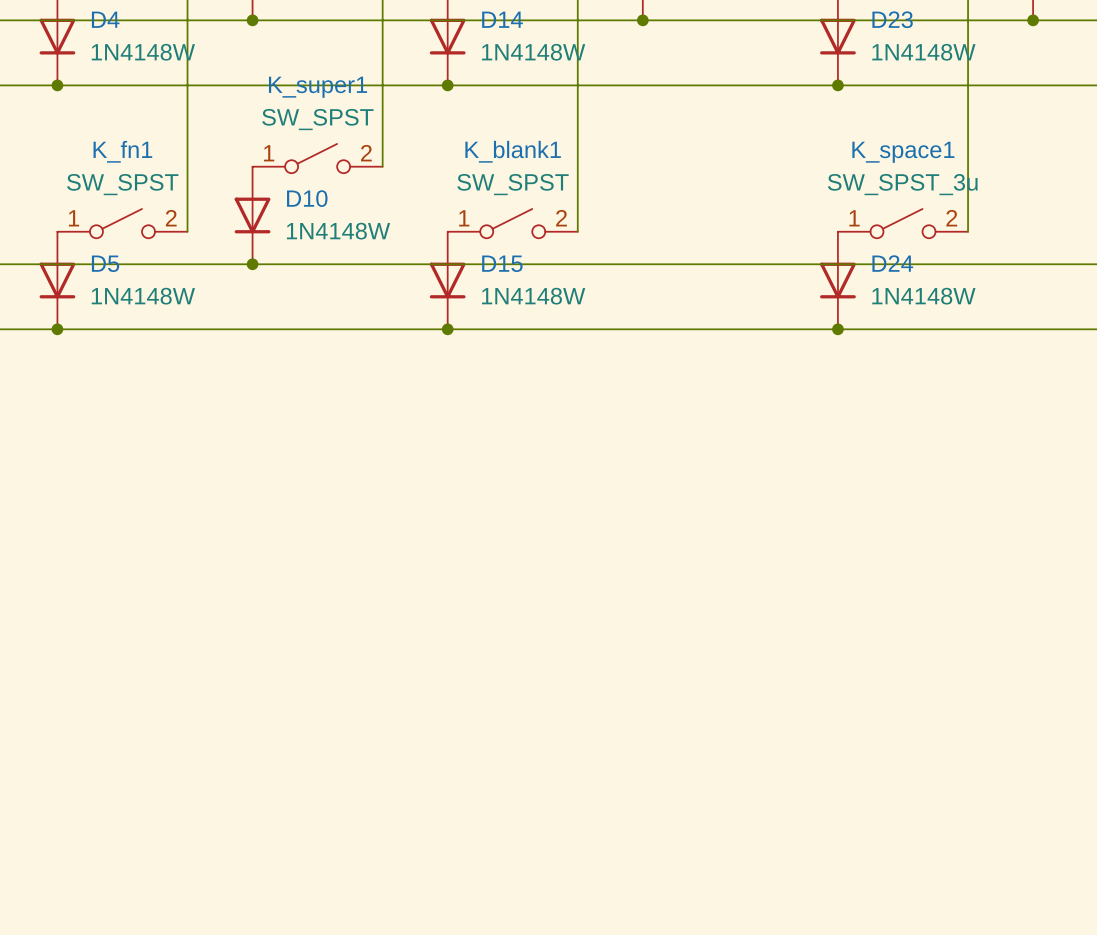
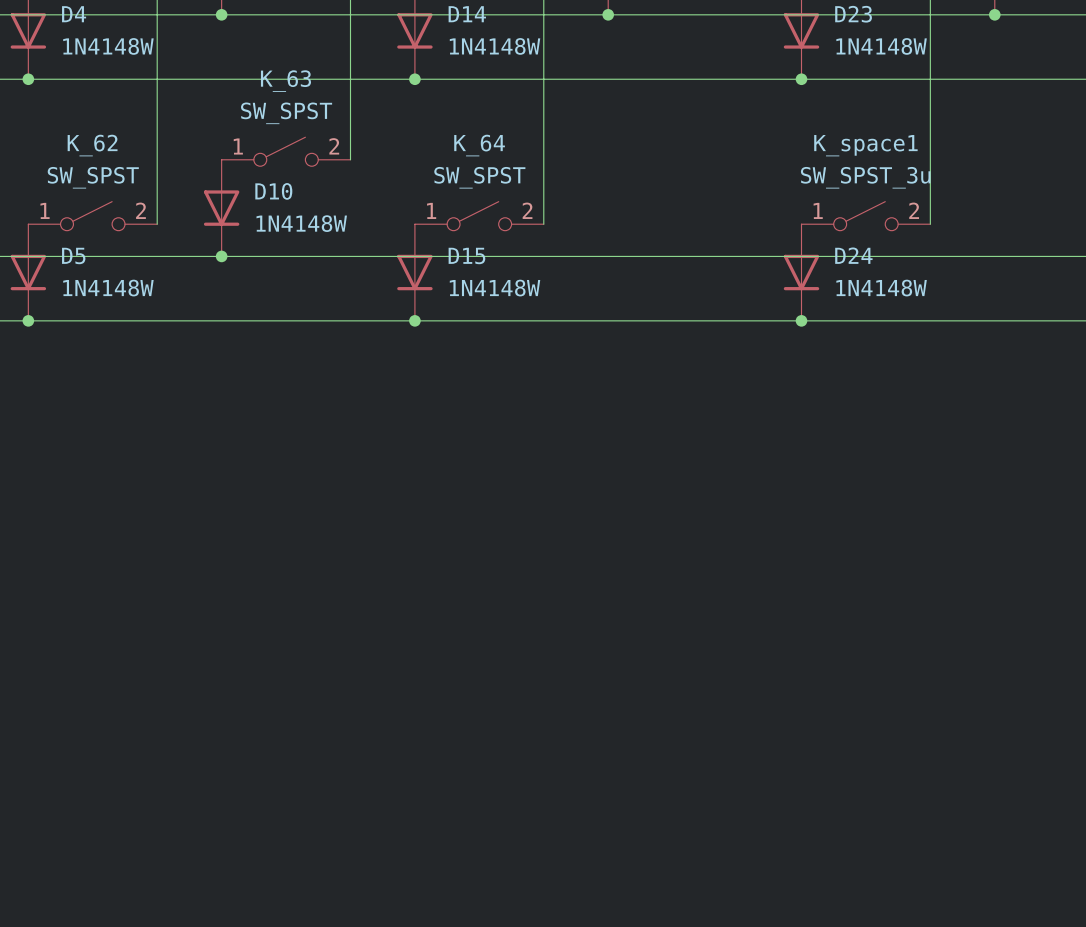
K_super1 name: K_super1 (318, 87) -> K_63 (285, 81)
K_fn1 name: K_fn1 (122, 151) -> K_62 (92, 145)
K_blank1 name: K_blank1 (513, 151) -> K_64 (479, 145)

